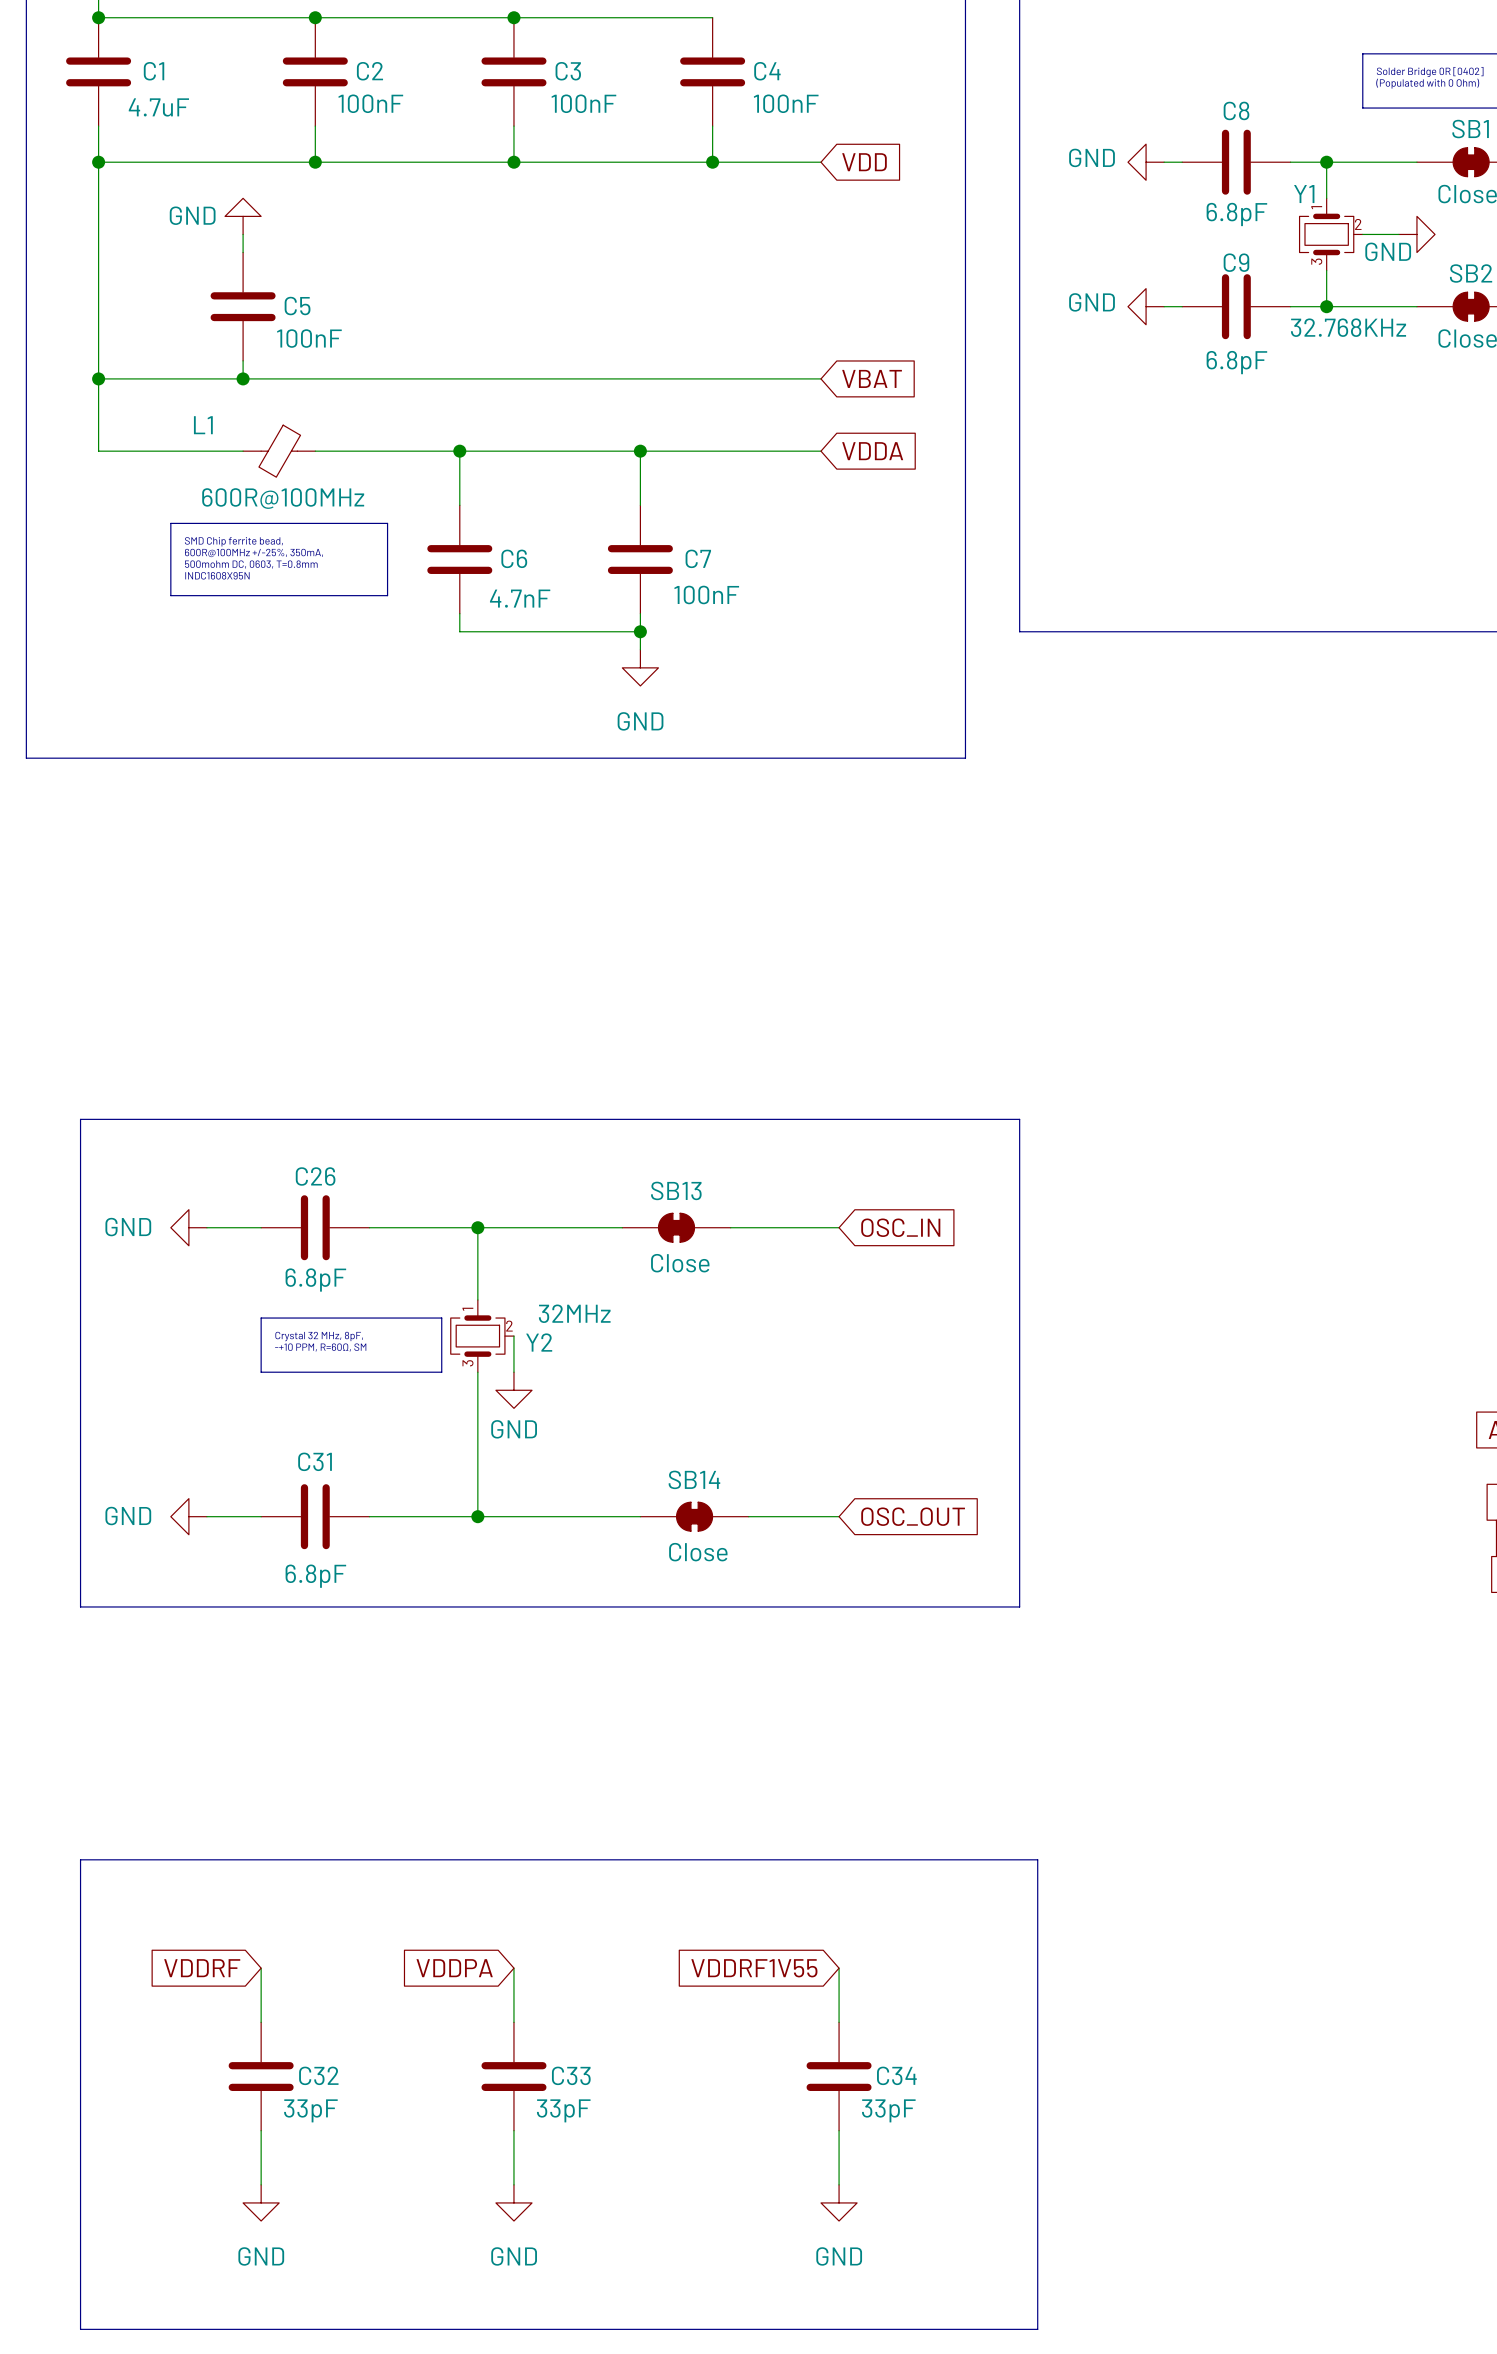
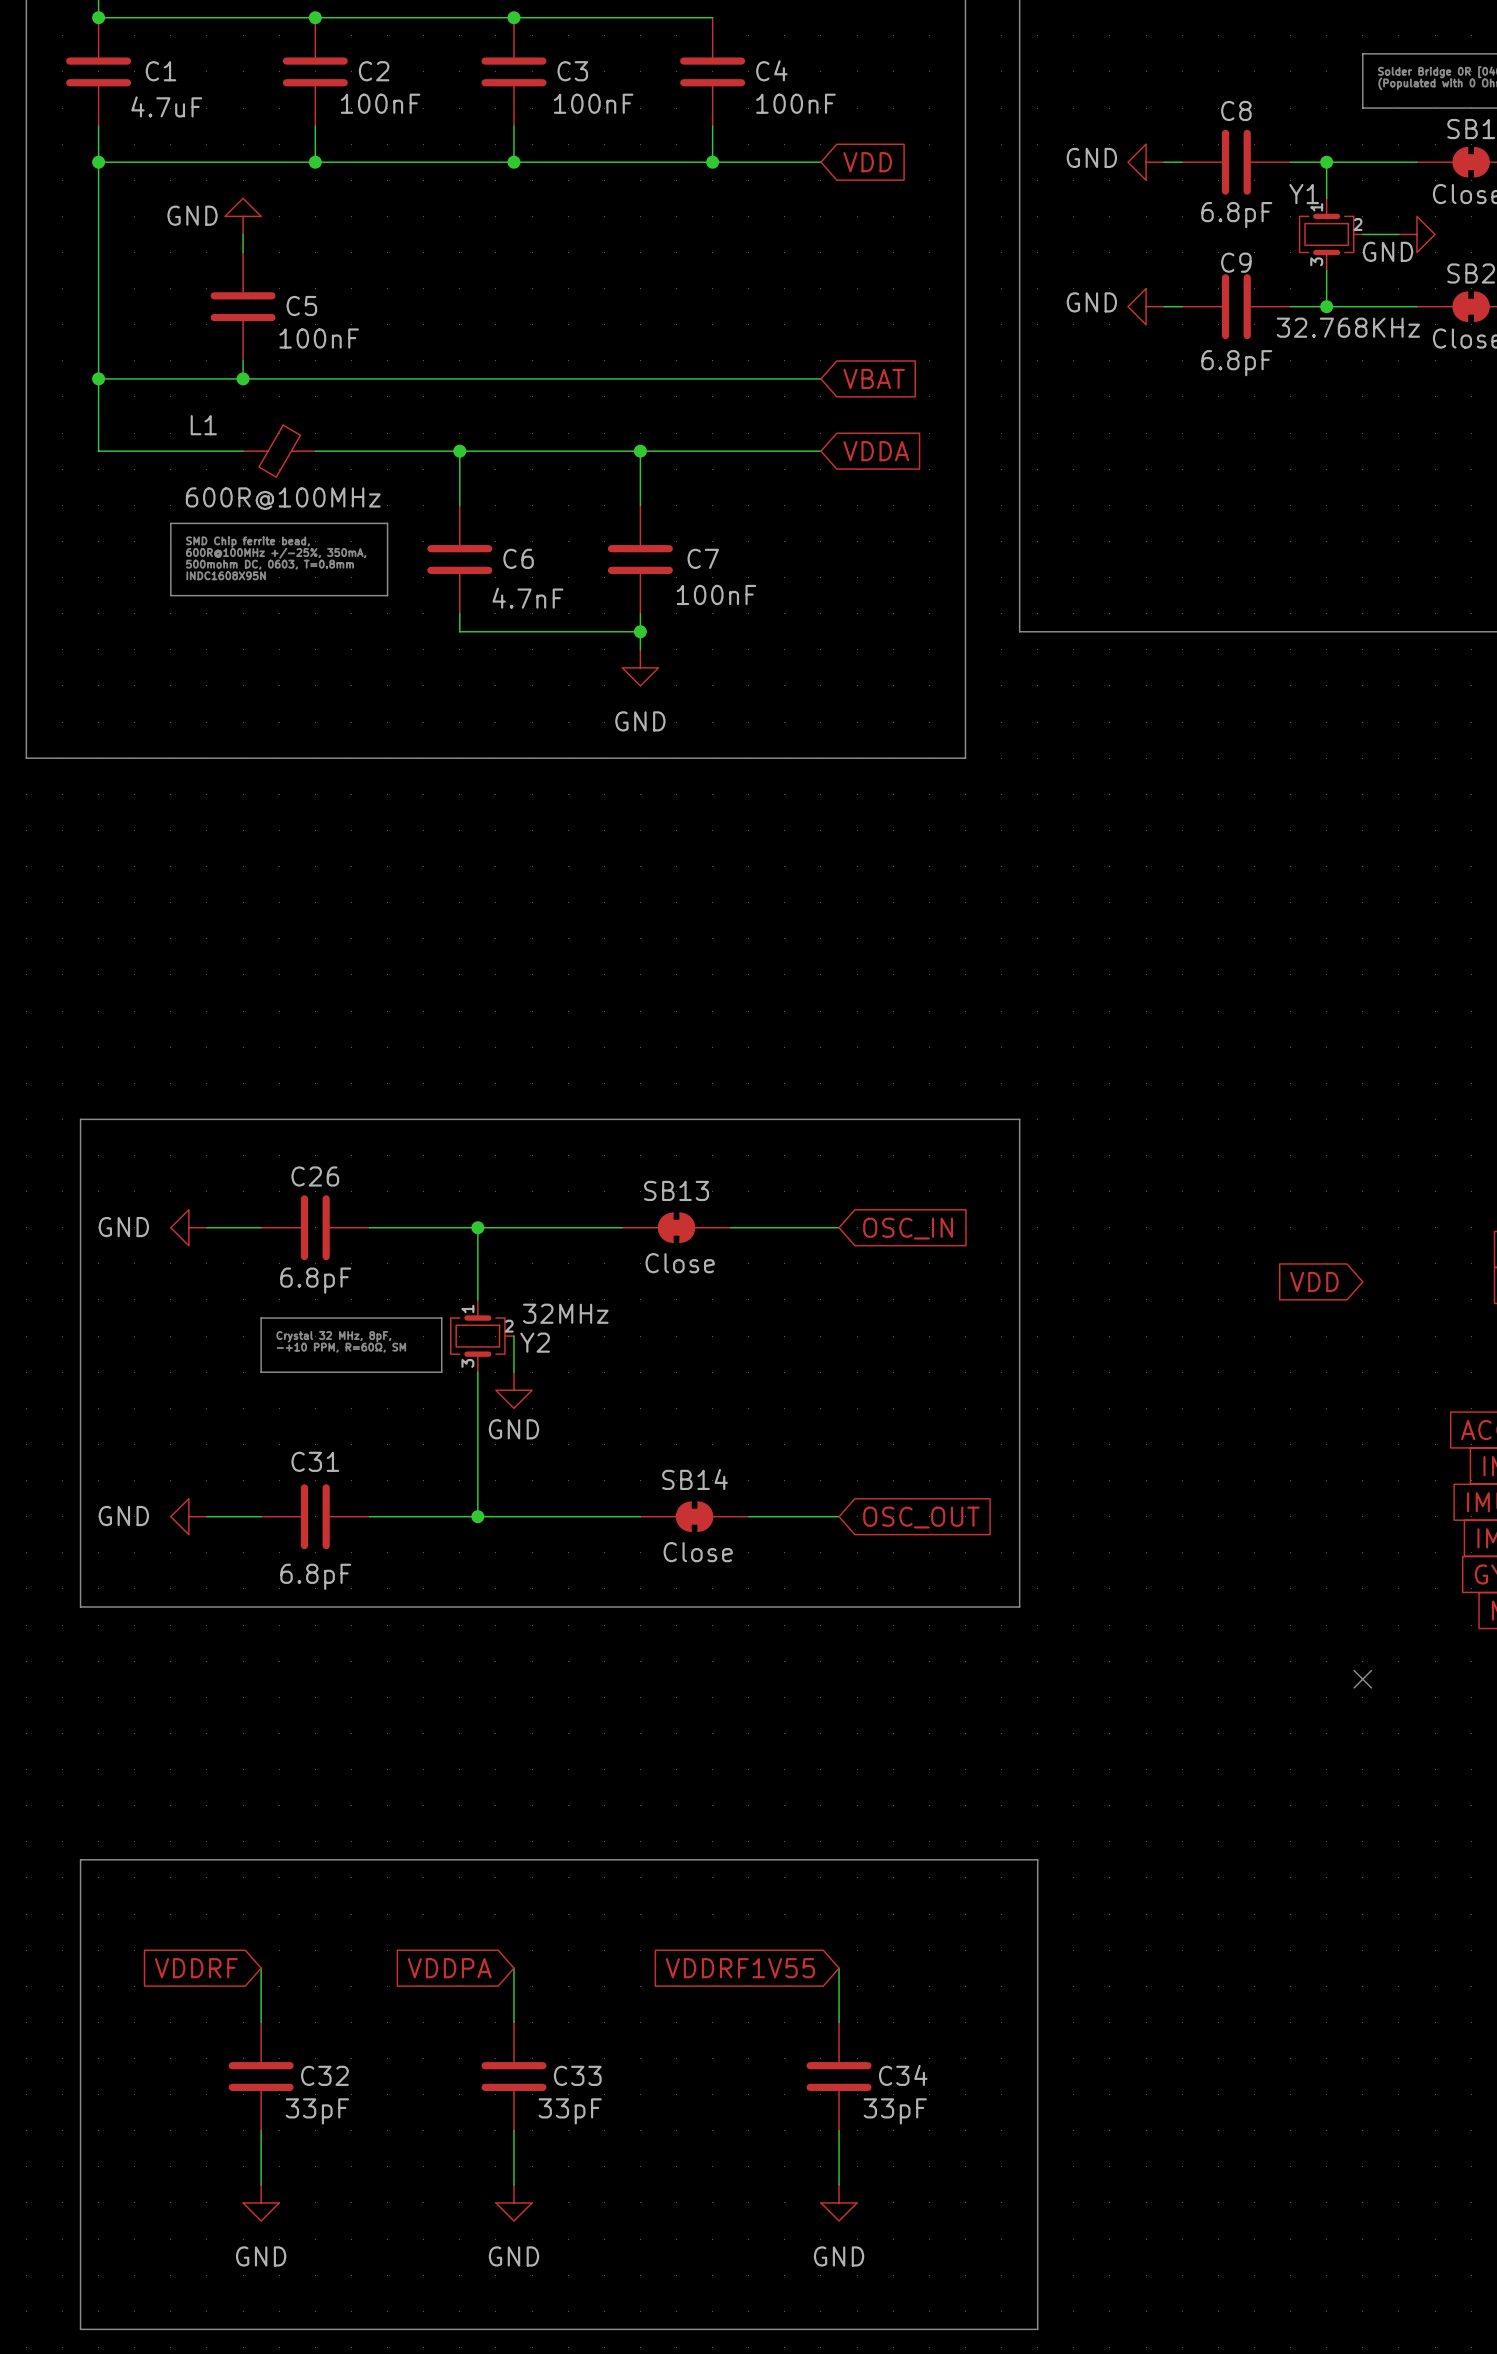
global label: none -> VDD (1314, 1281)
no-connect mark: none -> (1362, 1679)

